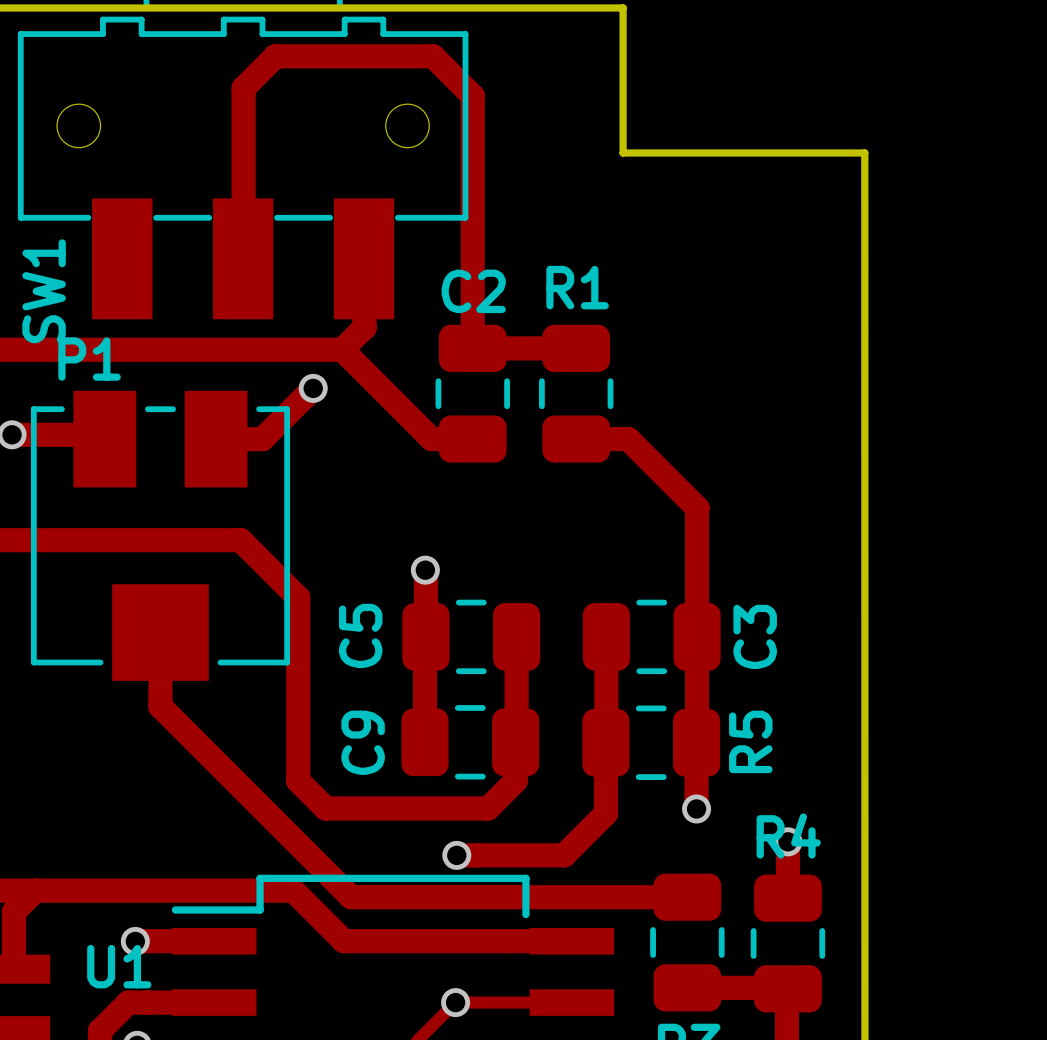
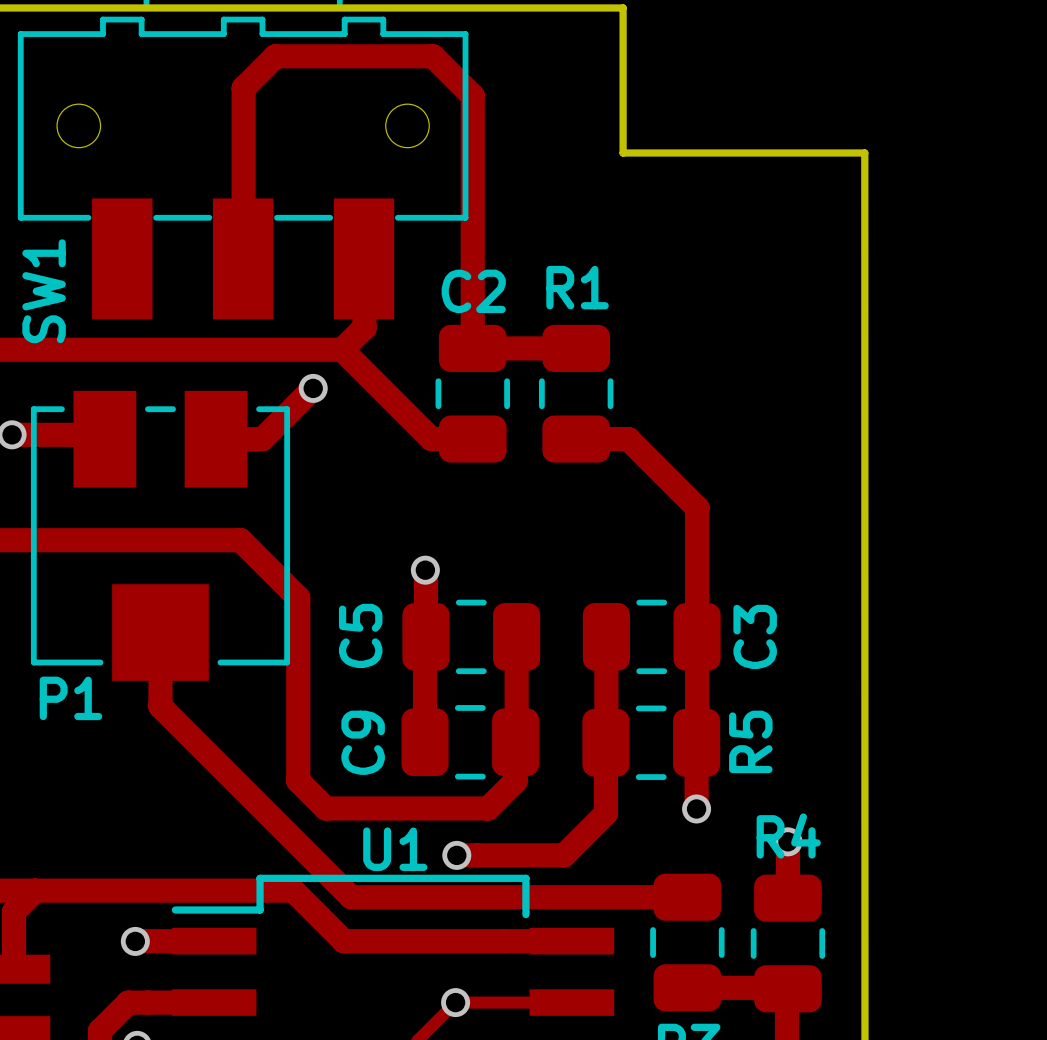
P1 name position: P1 (89, 359) -> P1 (70, 698)
U1 name position: U1 (119, 966) -> U1 (395, 849)

